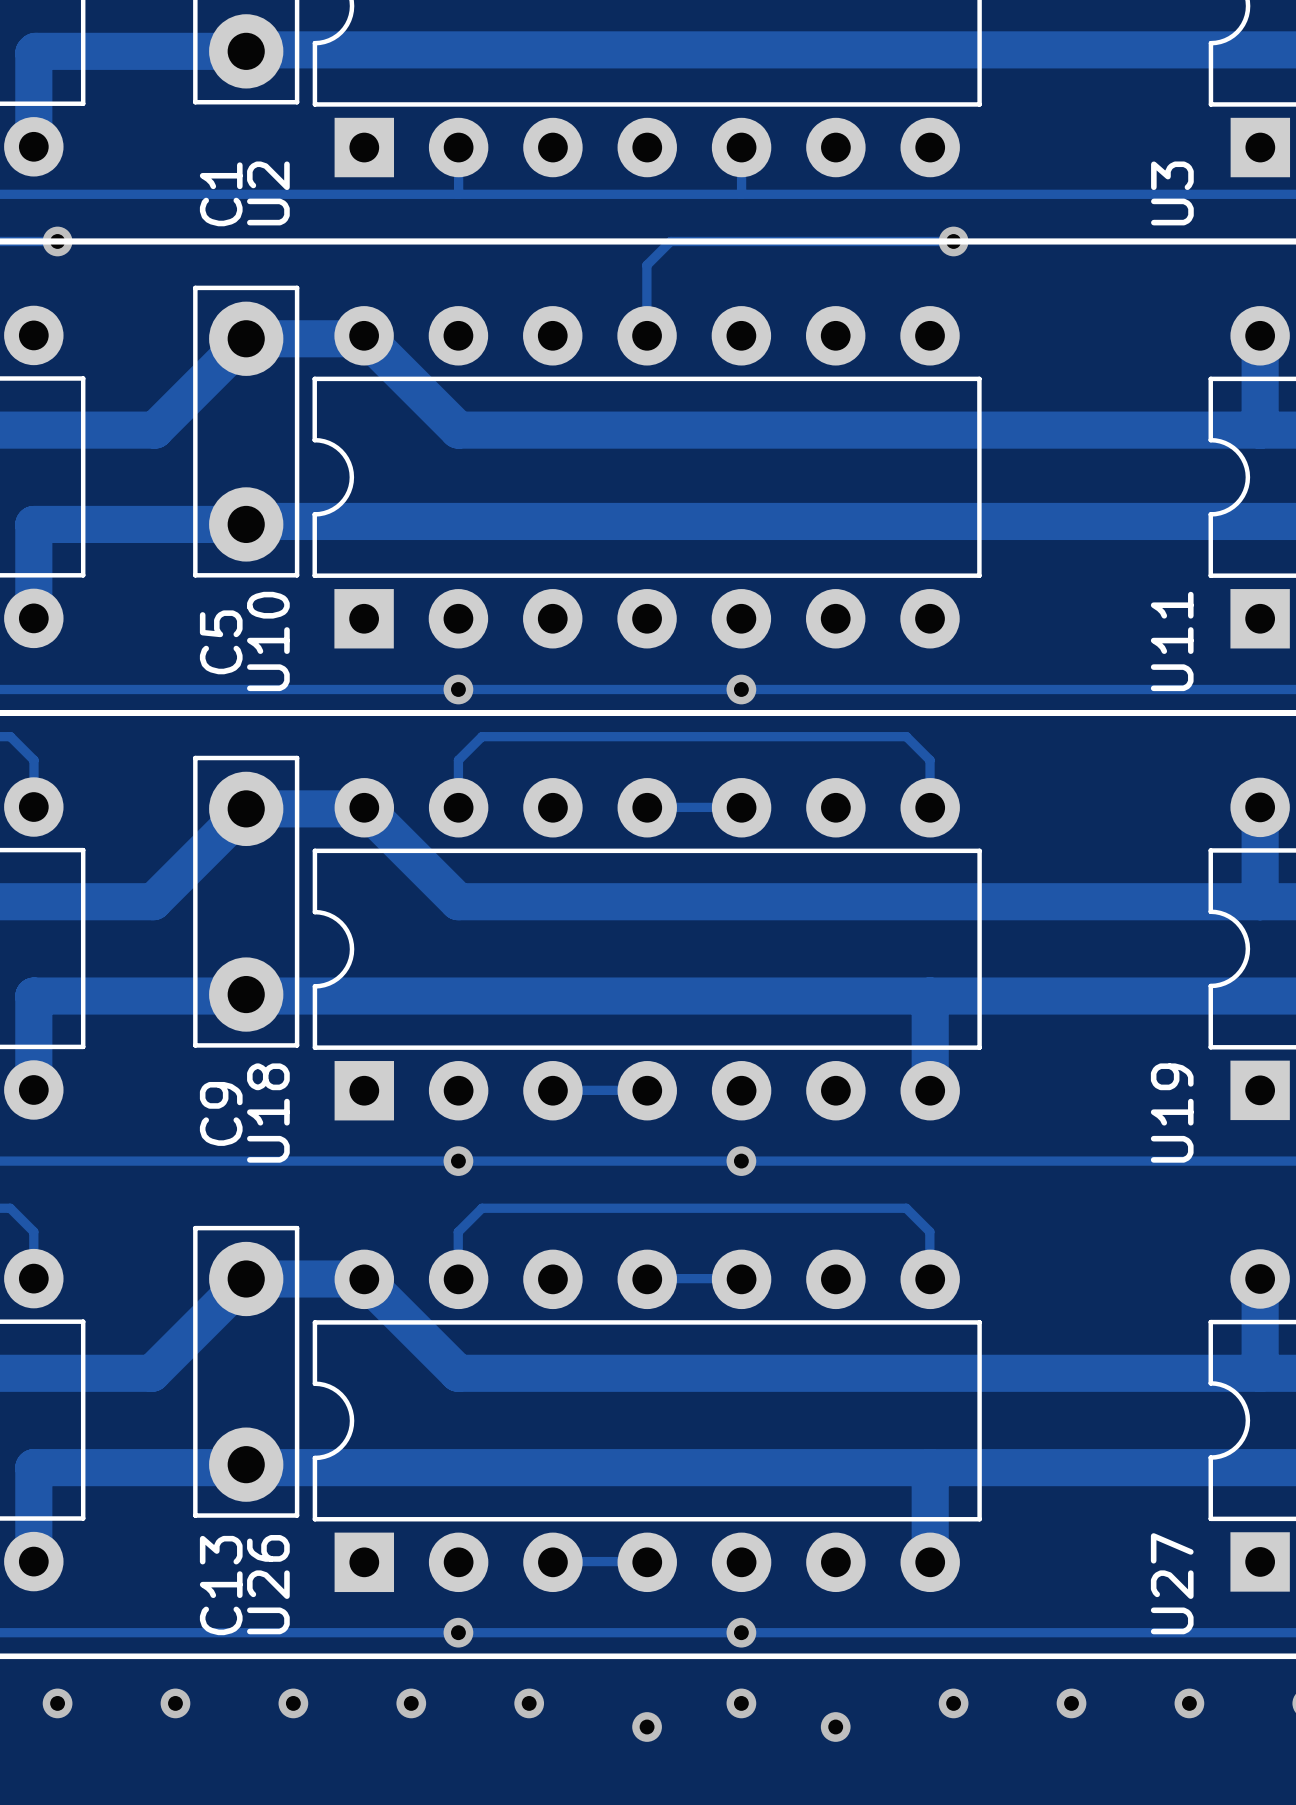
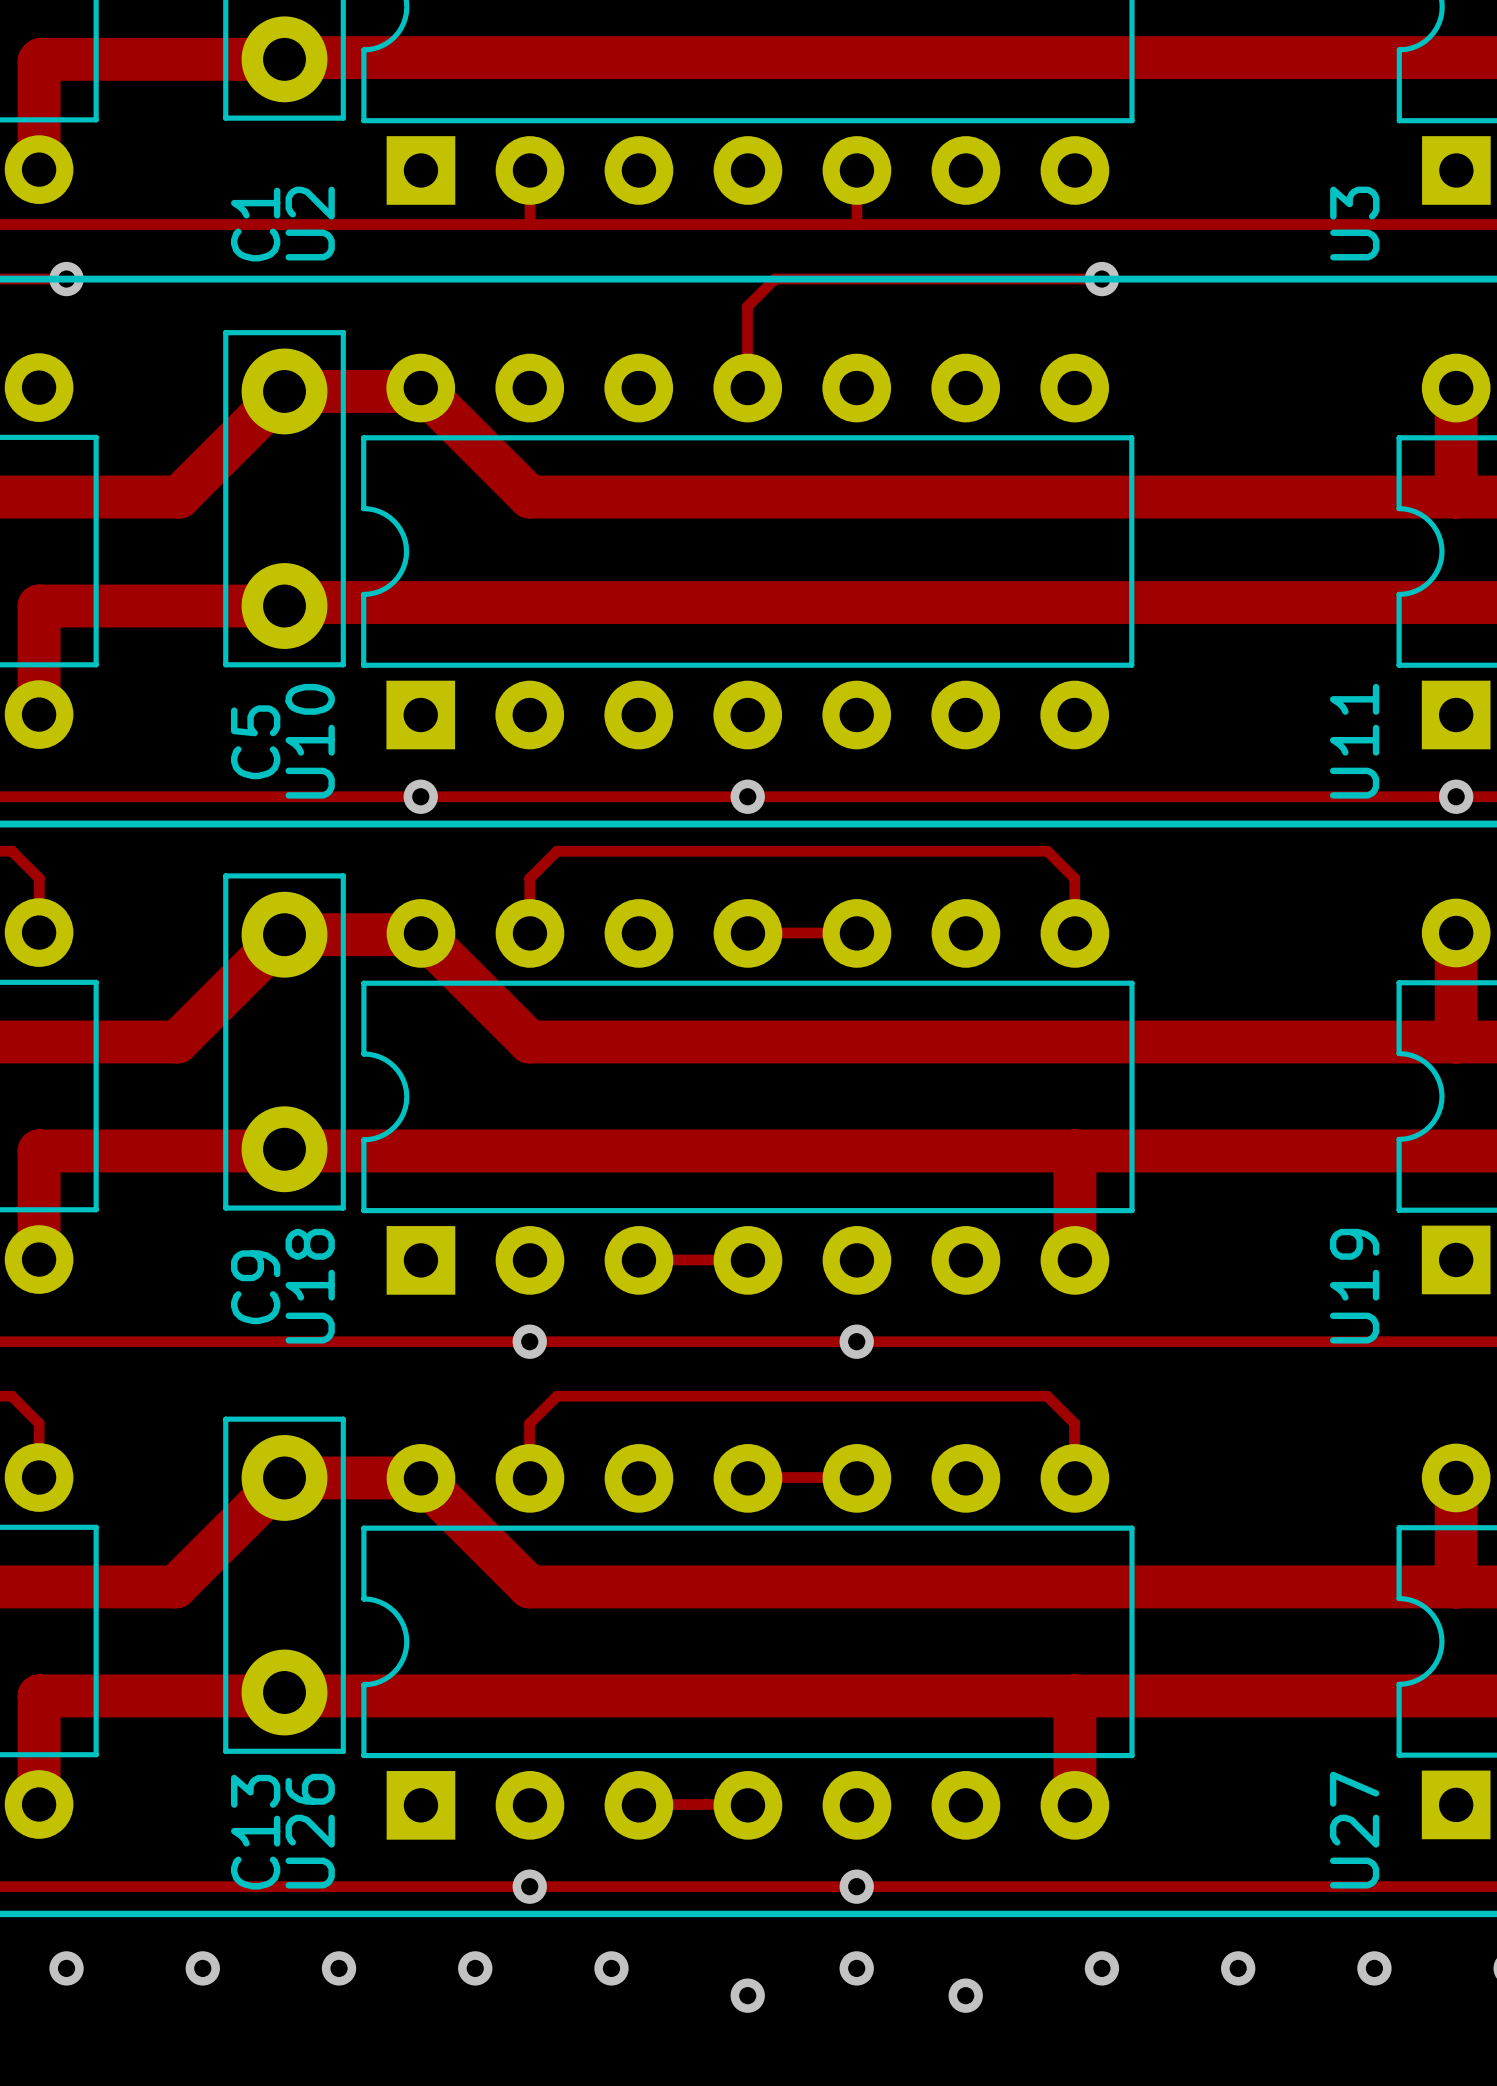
via: none -> (420, 796)
via: (458, 689) -> none
via: none -> (747, 796)
via: (741, 689) -> none
via: none -> (1456, 796)

